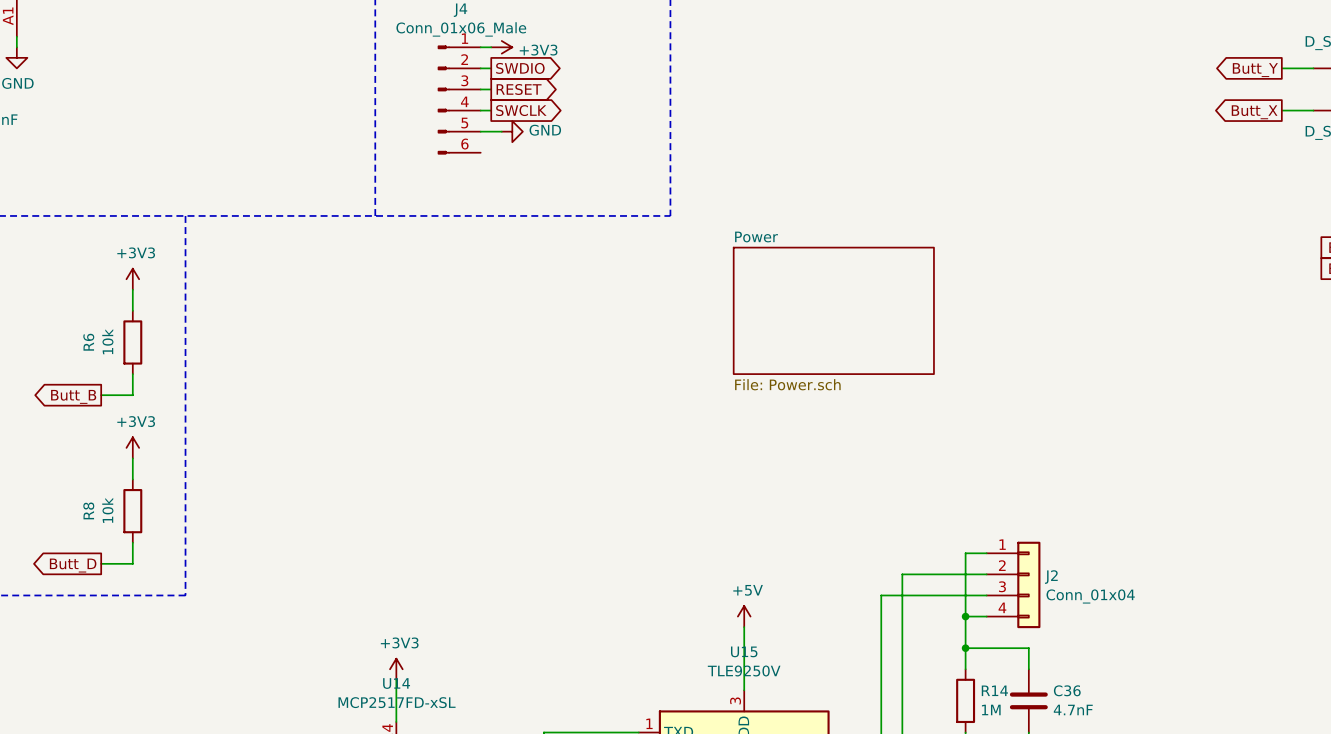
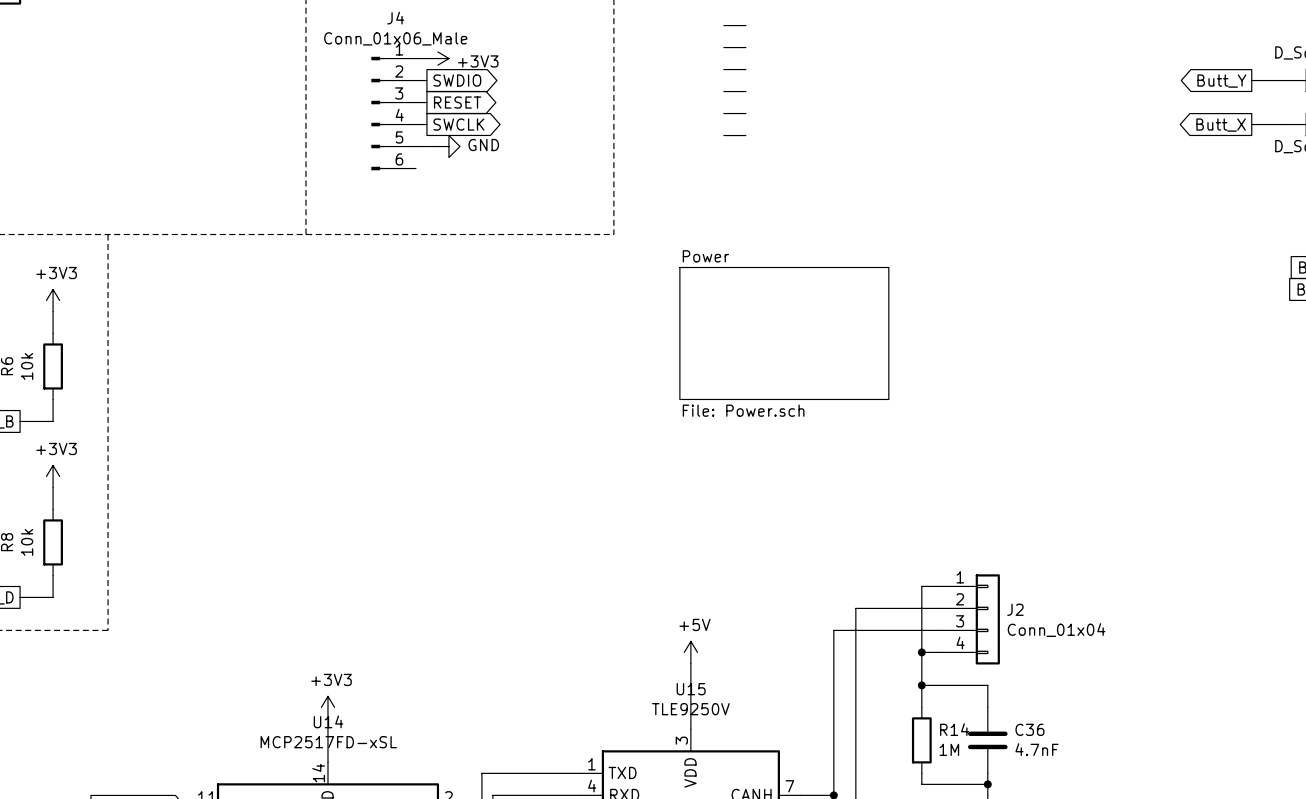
wire: none -> (723, 25) (745, 25)
wire: none -> (723, 47) (745, 47)
wire: none -> (723, 69) (745, 69)
wire: none -> (723, 91) (745, 91)
wire: none -> (723, 113) (745, 113)
wire: none -> (723, 135) (745, 135)

